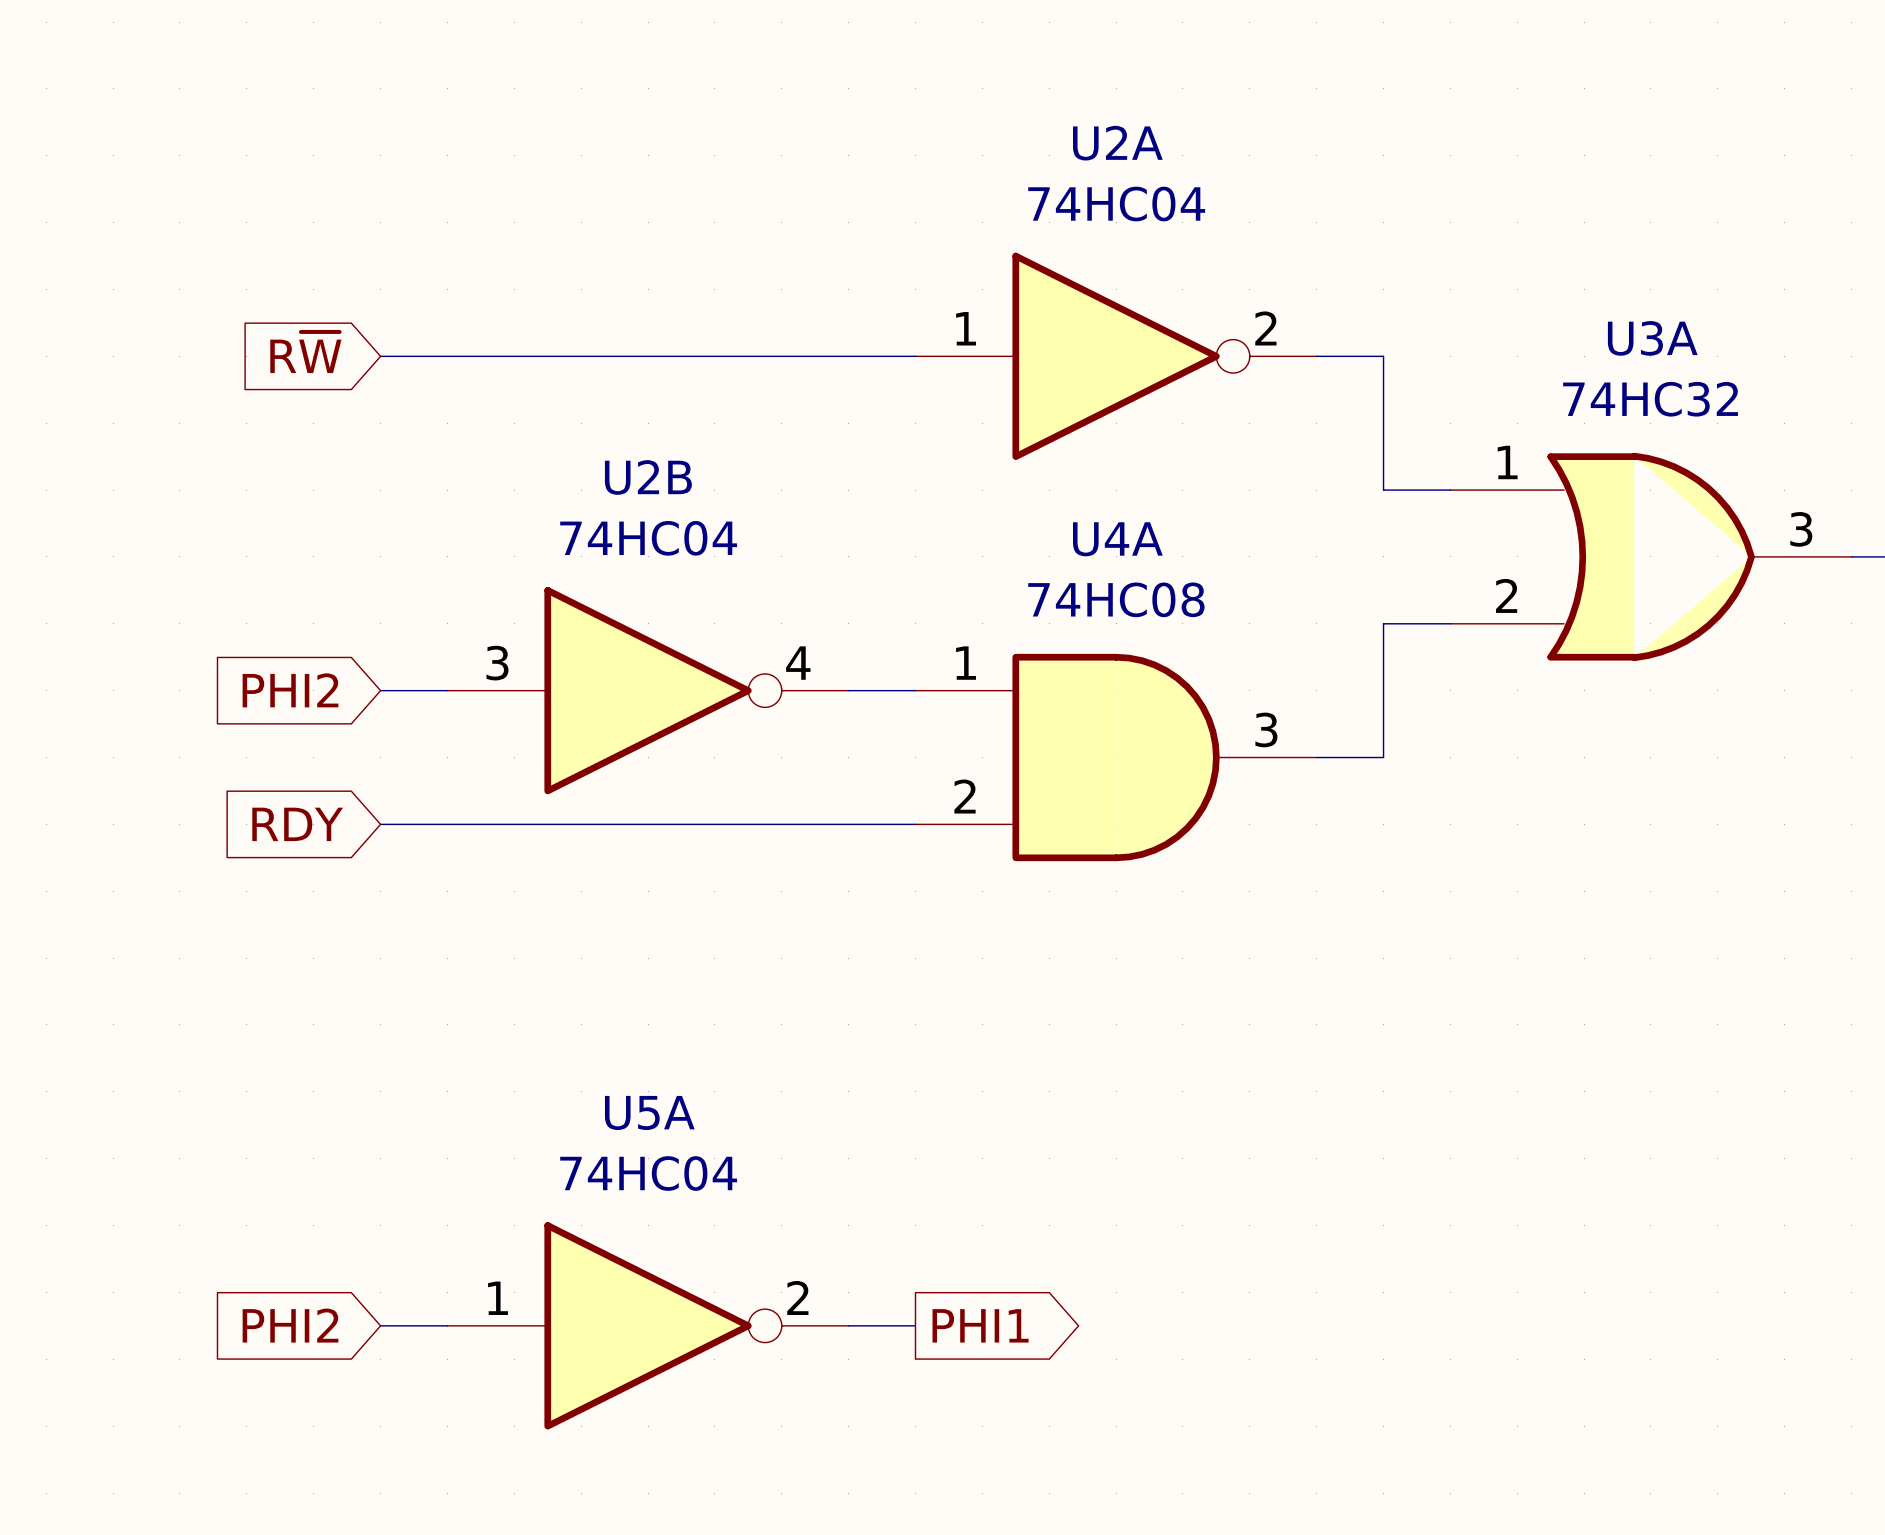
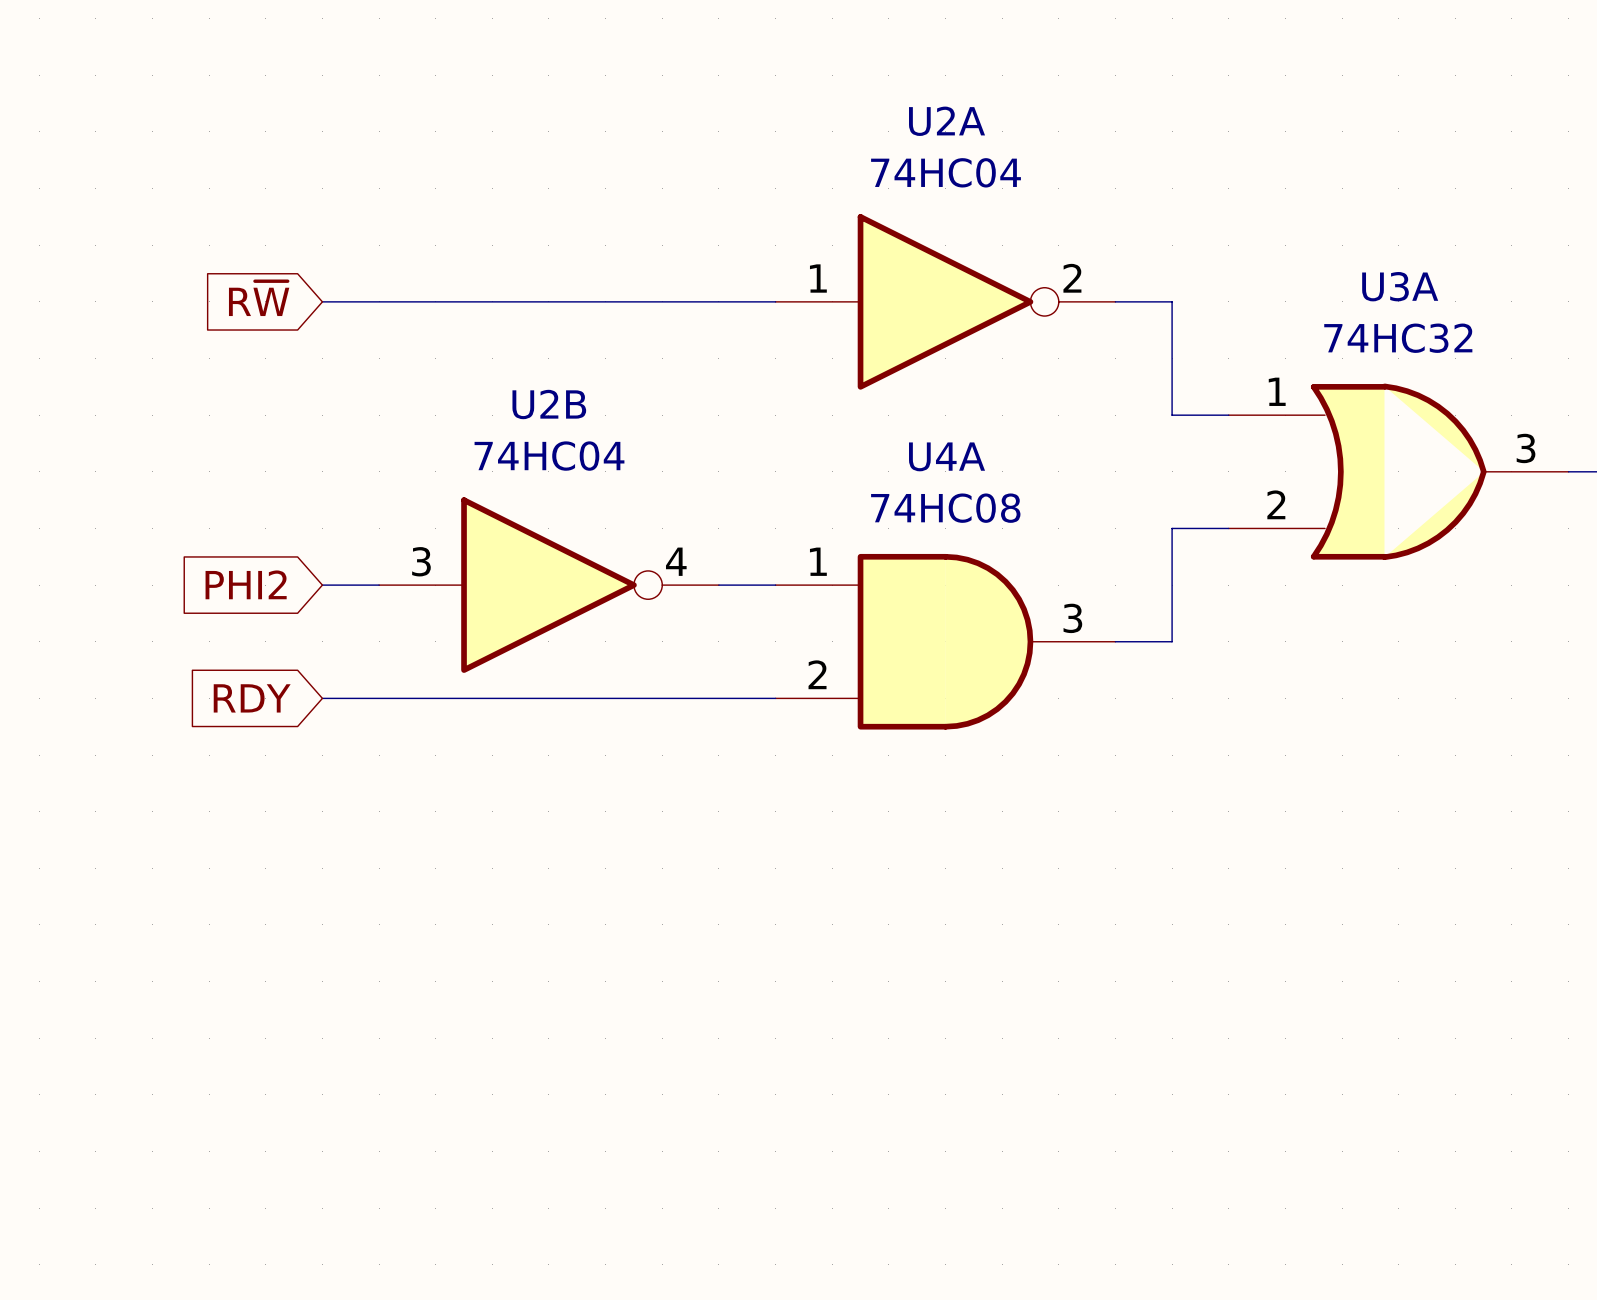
global label: PHI2 (290, 1325) -> none
wire: (380, 1325) (447, 1325) -> none
U5A: 74HC04 (648, 1325) -> none
wire: (848, 1325) (915, 1325) -> none
global label: PHI1 (980, 1325) -> none

